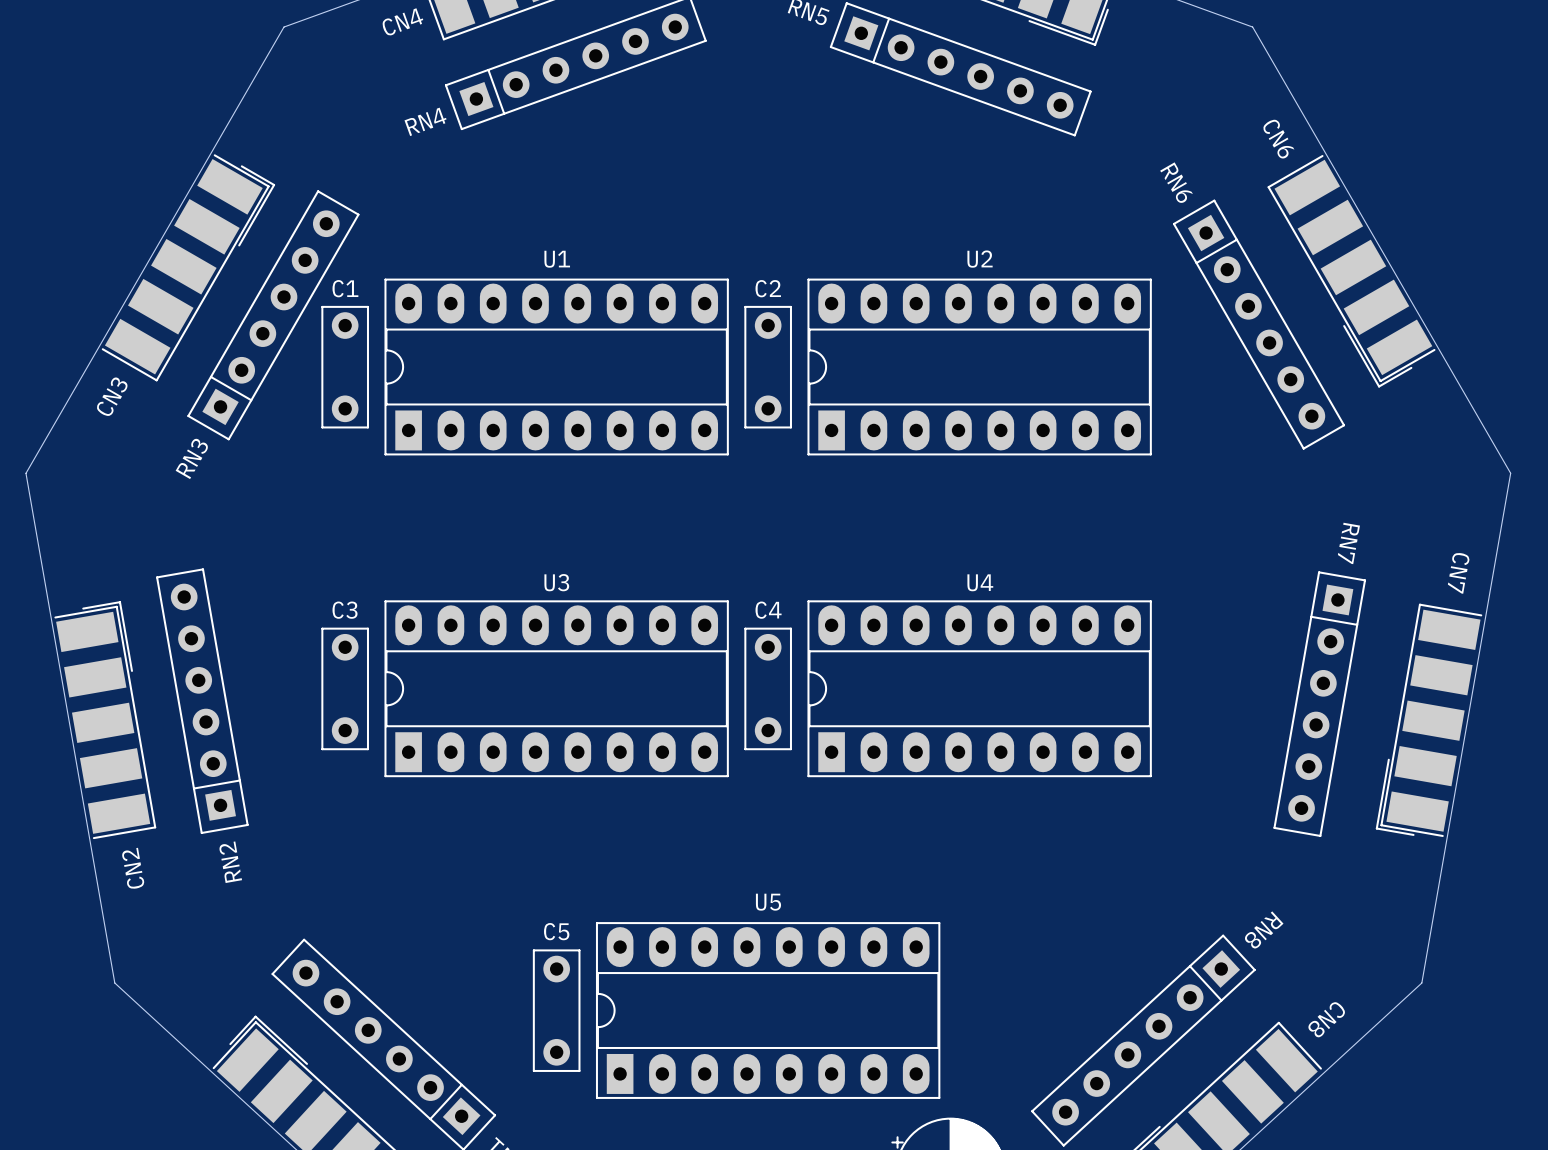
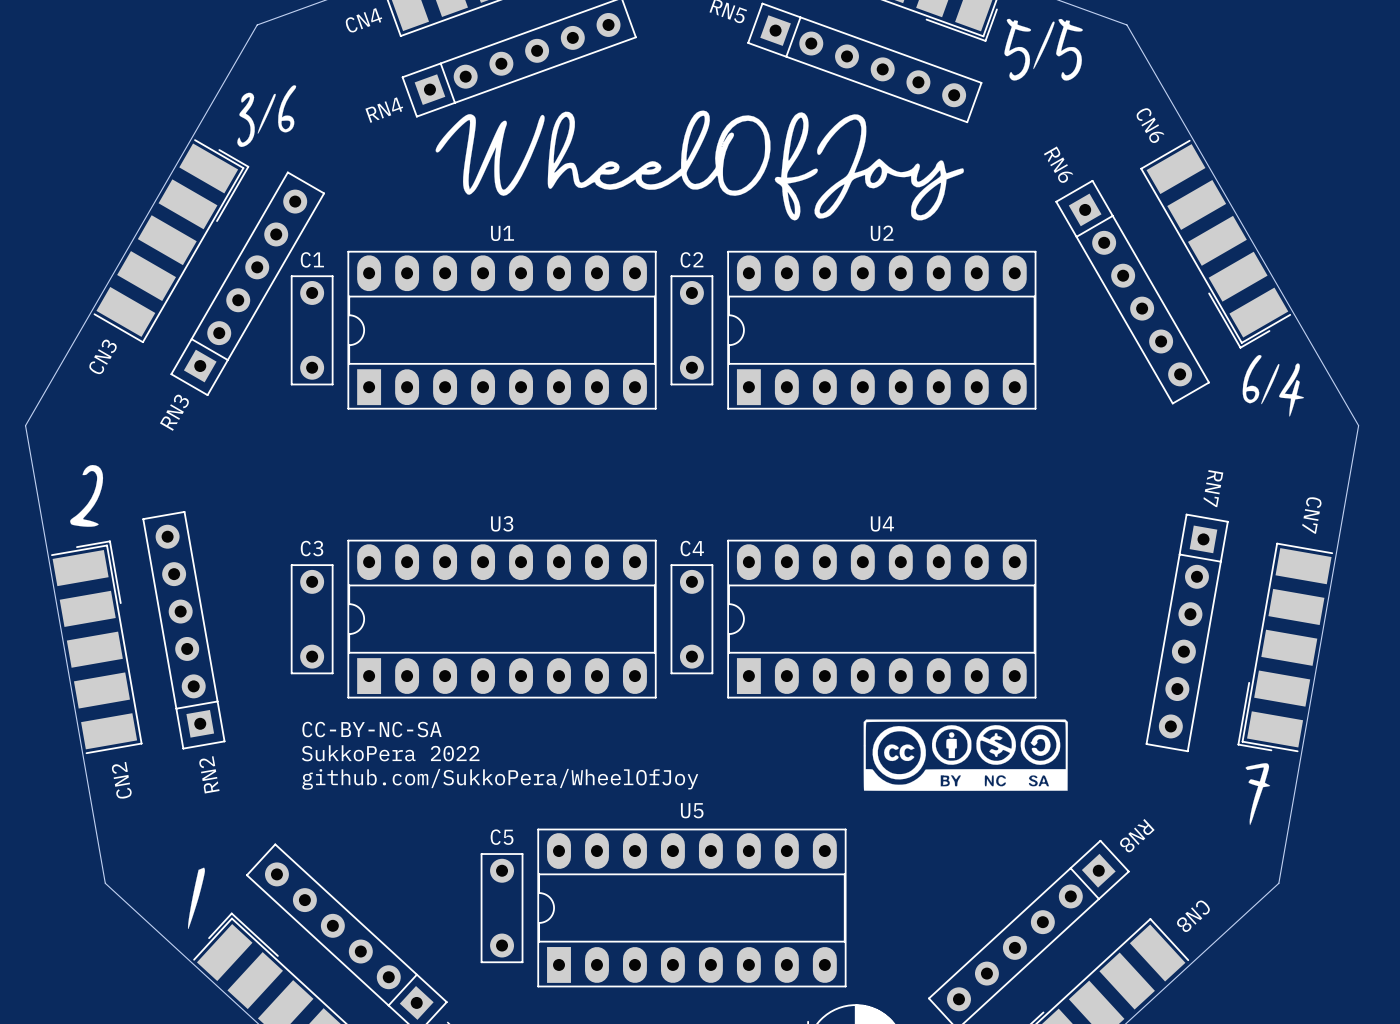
drawing: none -> [1004, 18, 1083, 81]
drawing: none -> [237, 85, 297, 147]
drawing: none -> [435, 110, 964, 221]
drawing: none -> [1242, 354, 1305, 417]
drawing: none -> [70, 464, 104, 527]
drawing: none -> [863, 719, 1068, 791]
text: none -> CC-BY-NC-SA (372, 729)
text: none -> SukkoPera 2022 (390, 753)
drawing: none -> [1245, 763, 1271, 826]
text: none -> github.com/SukkoPera/WheelOfJoy (500, 779)
drawing: none -> [187, 867, 205, 929]

